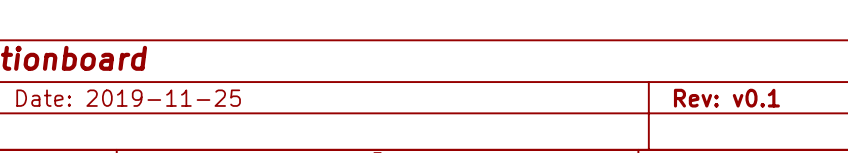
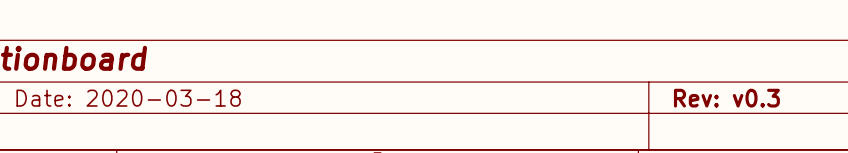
title block: Date: 2019-11-25 (128, 98) -> Date: 2020-03-18 (128, 98)
title block: Rev: v0.1 (726, 98) -> Rev: v0.3 (726, 98)

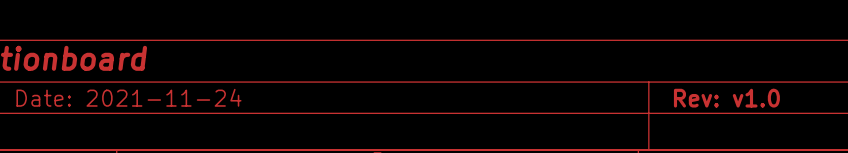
title block: Date: 2020-03-18 (128, 98) -> Date: 2021-11-24 (128, 97)
title block: Rev: v0.3 (726, 98) -> Rev: v1.0 (726, 98)

